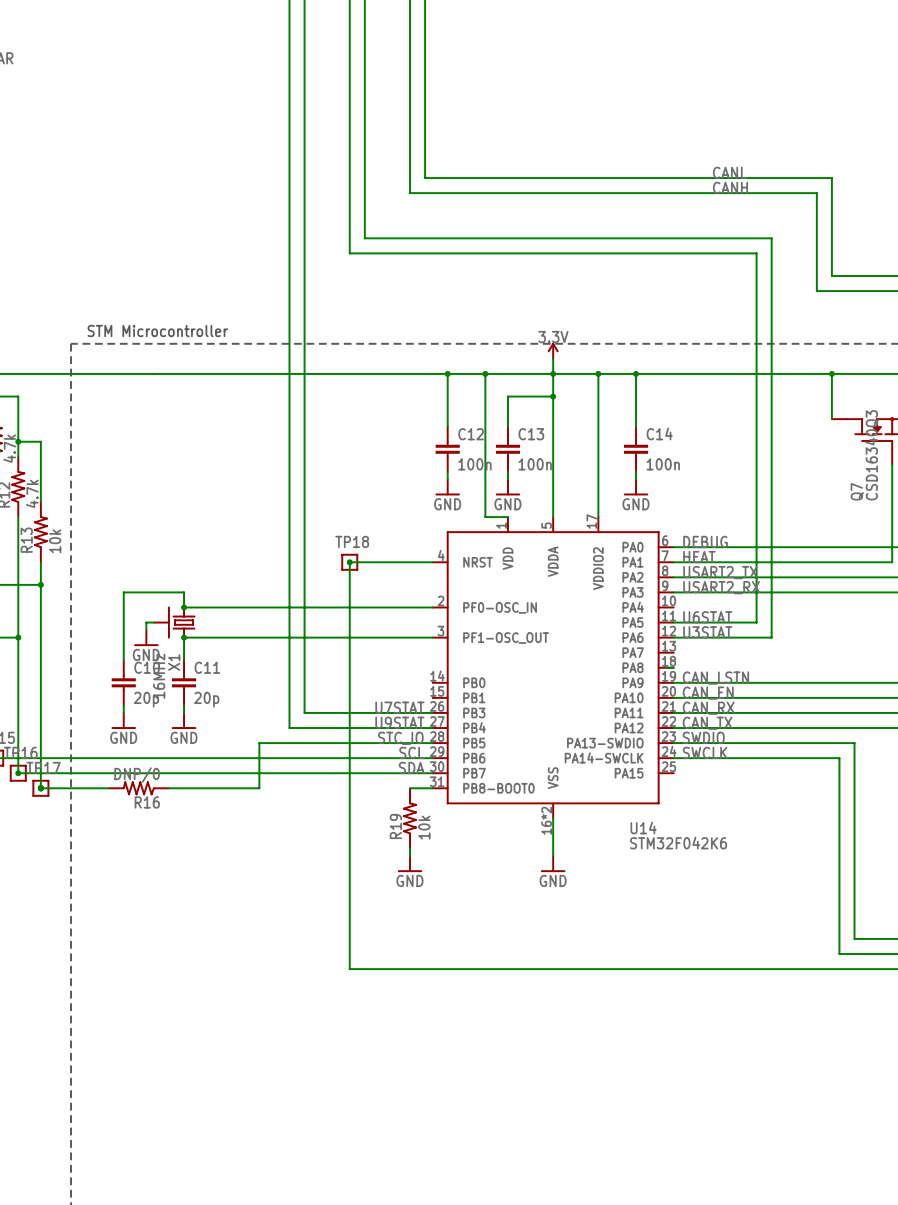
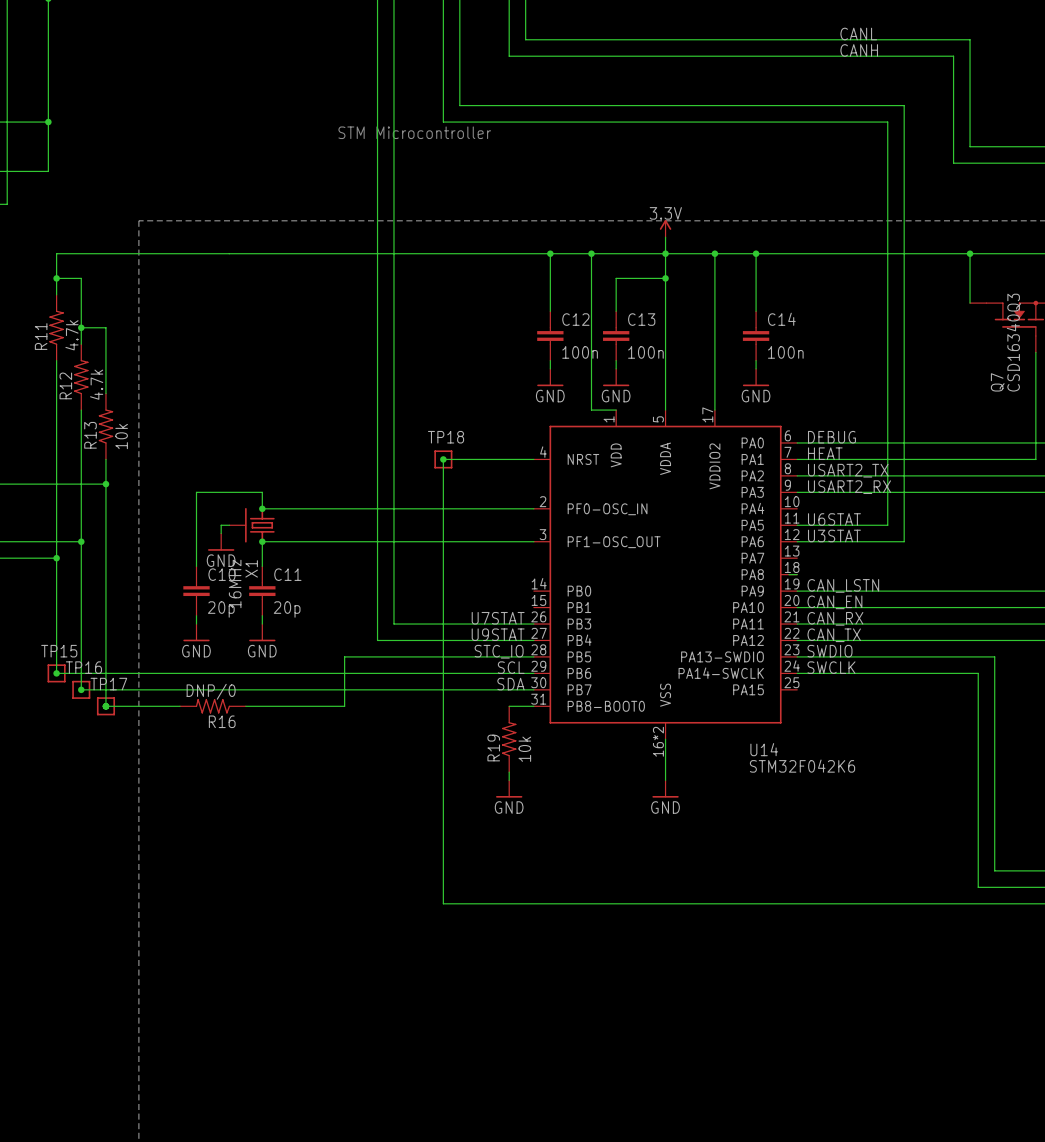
text: none -> STM Microcontroller (414, 132)
text: STM Microcontroller (157, 331) -> none

